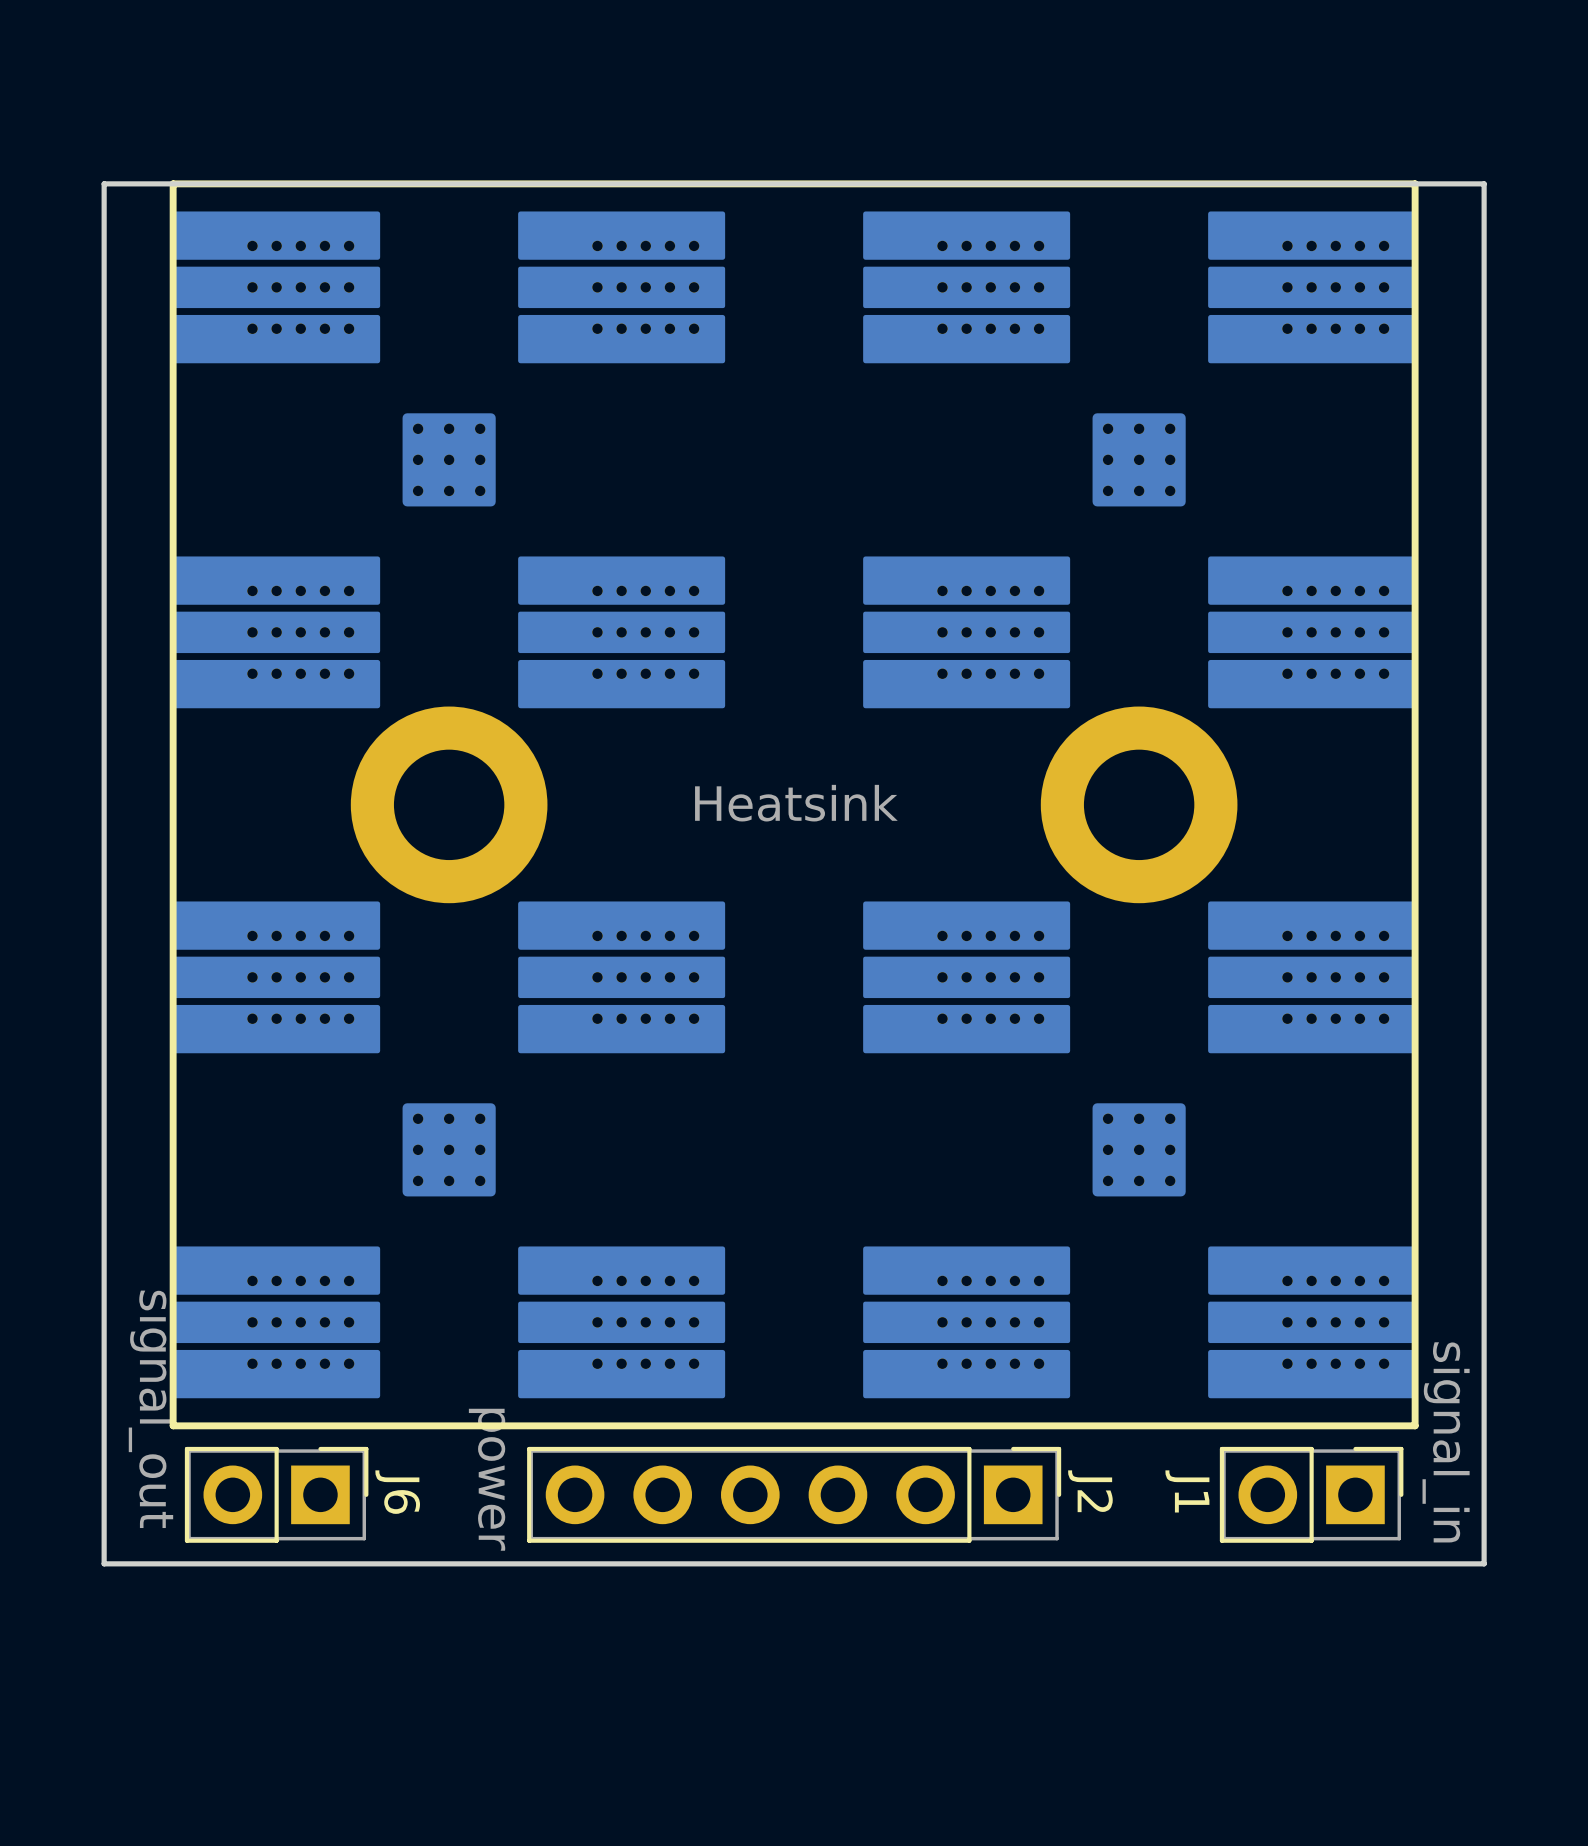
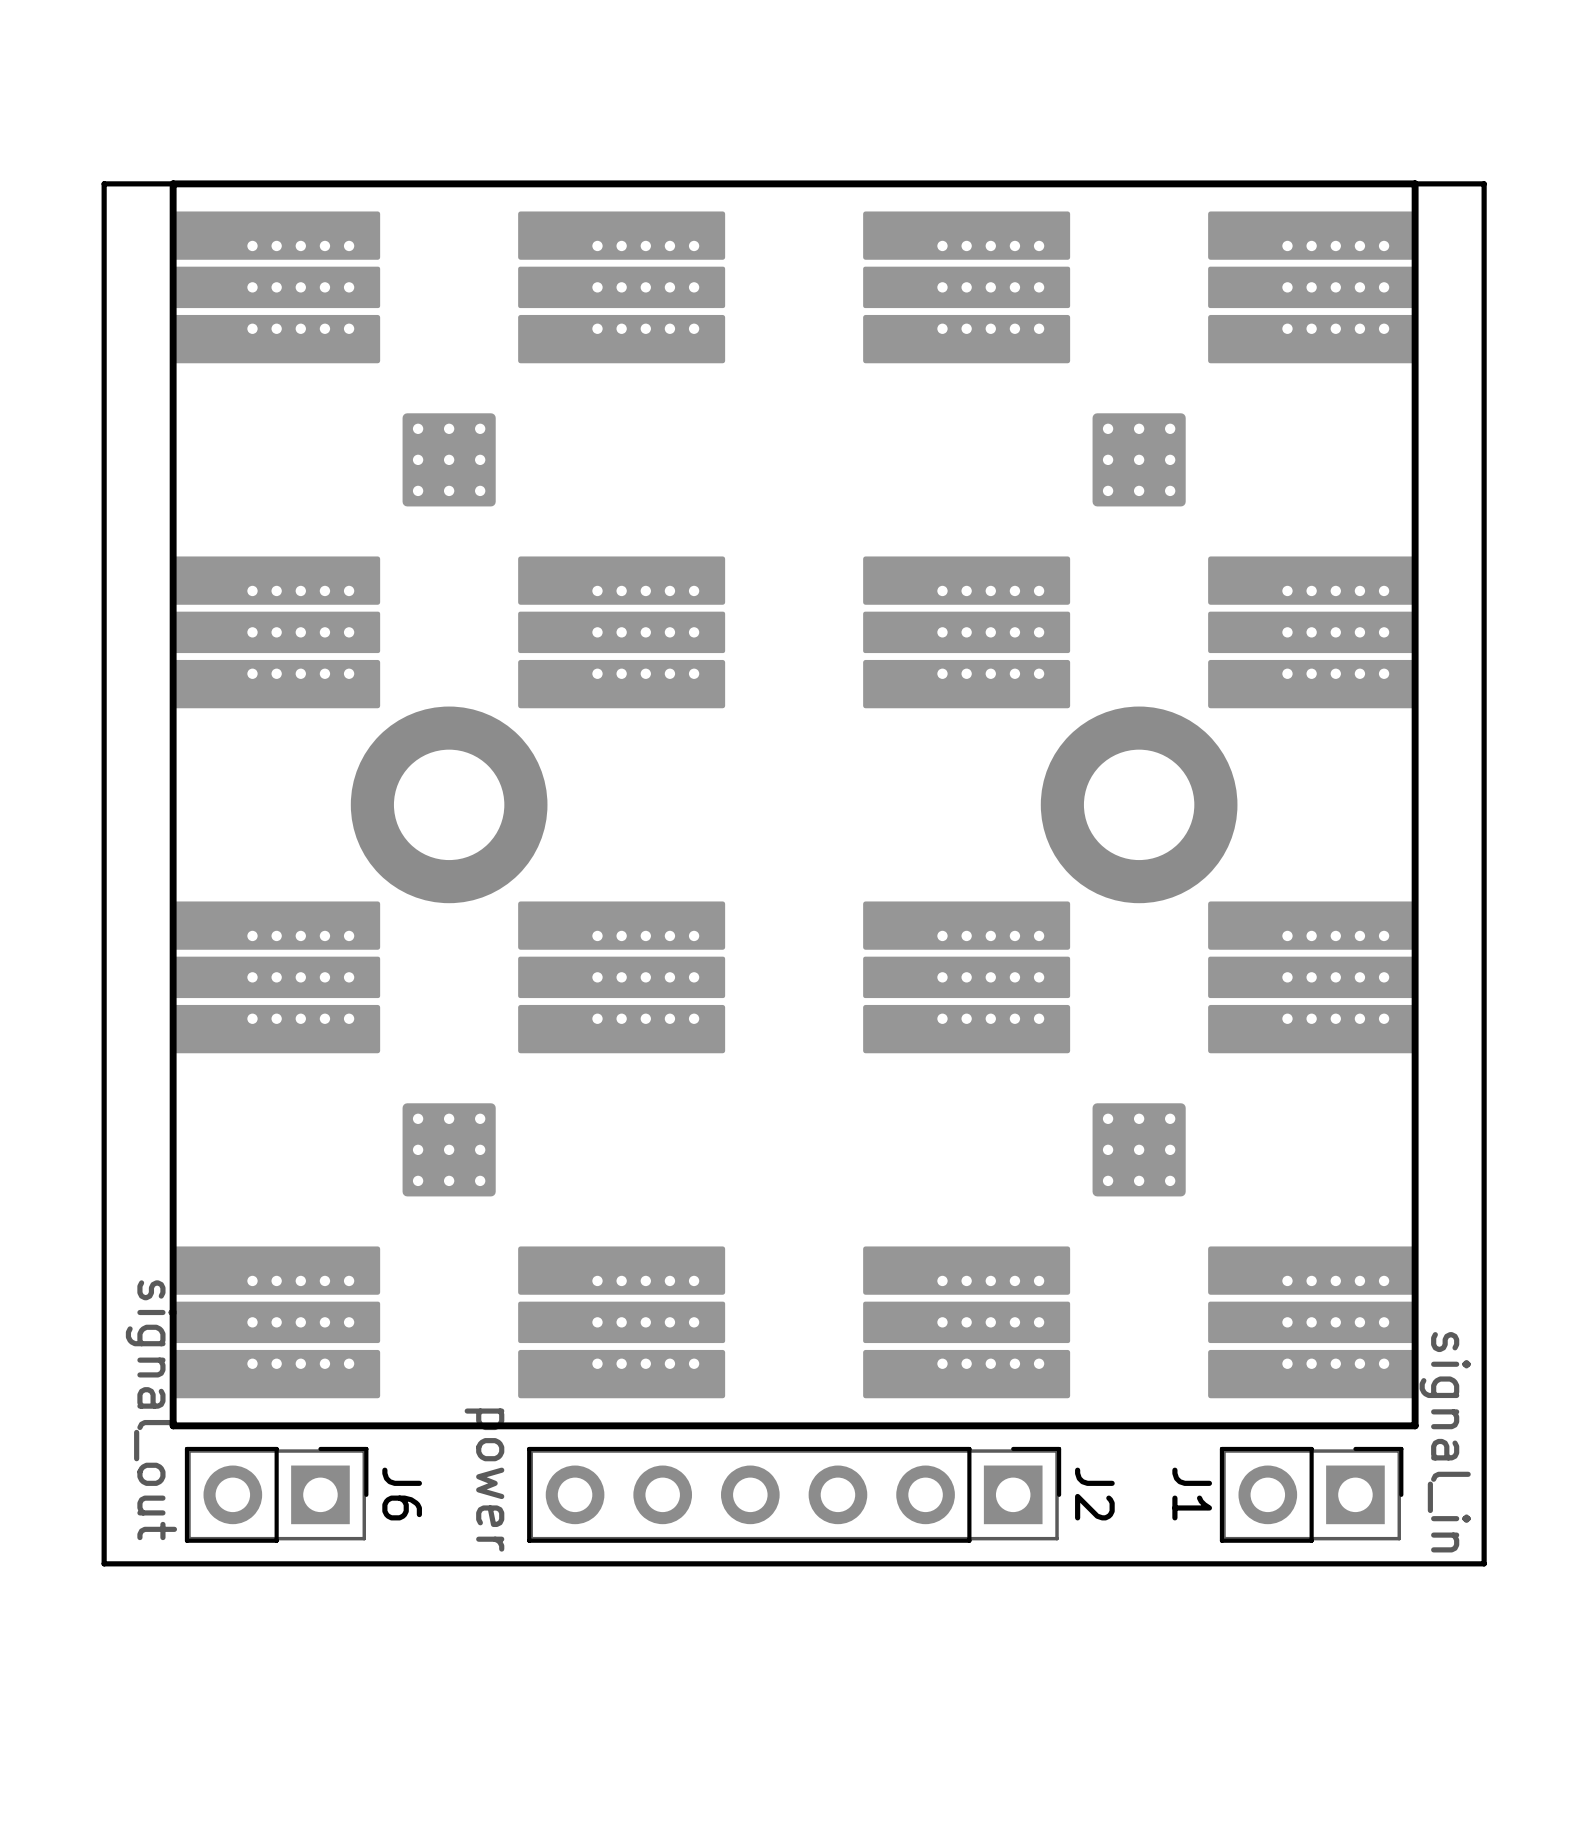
drawing: [695, 784, 898, 822] -> none

